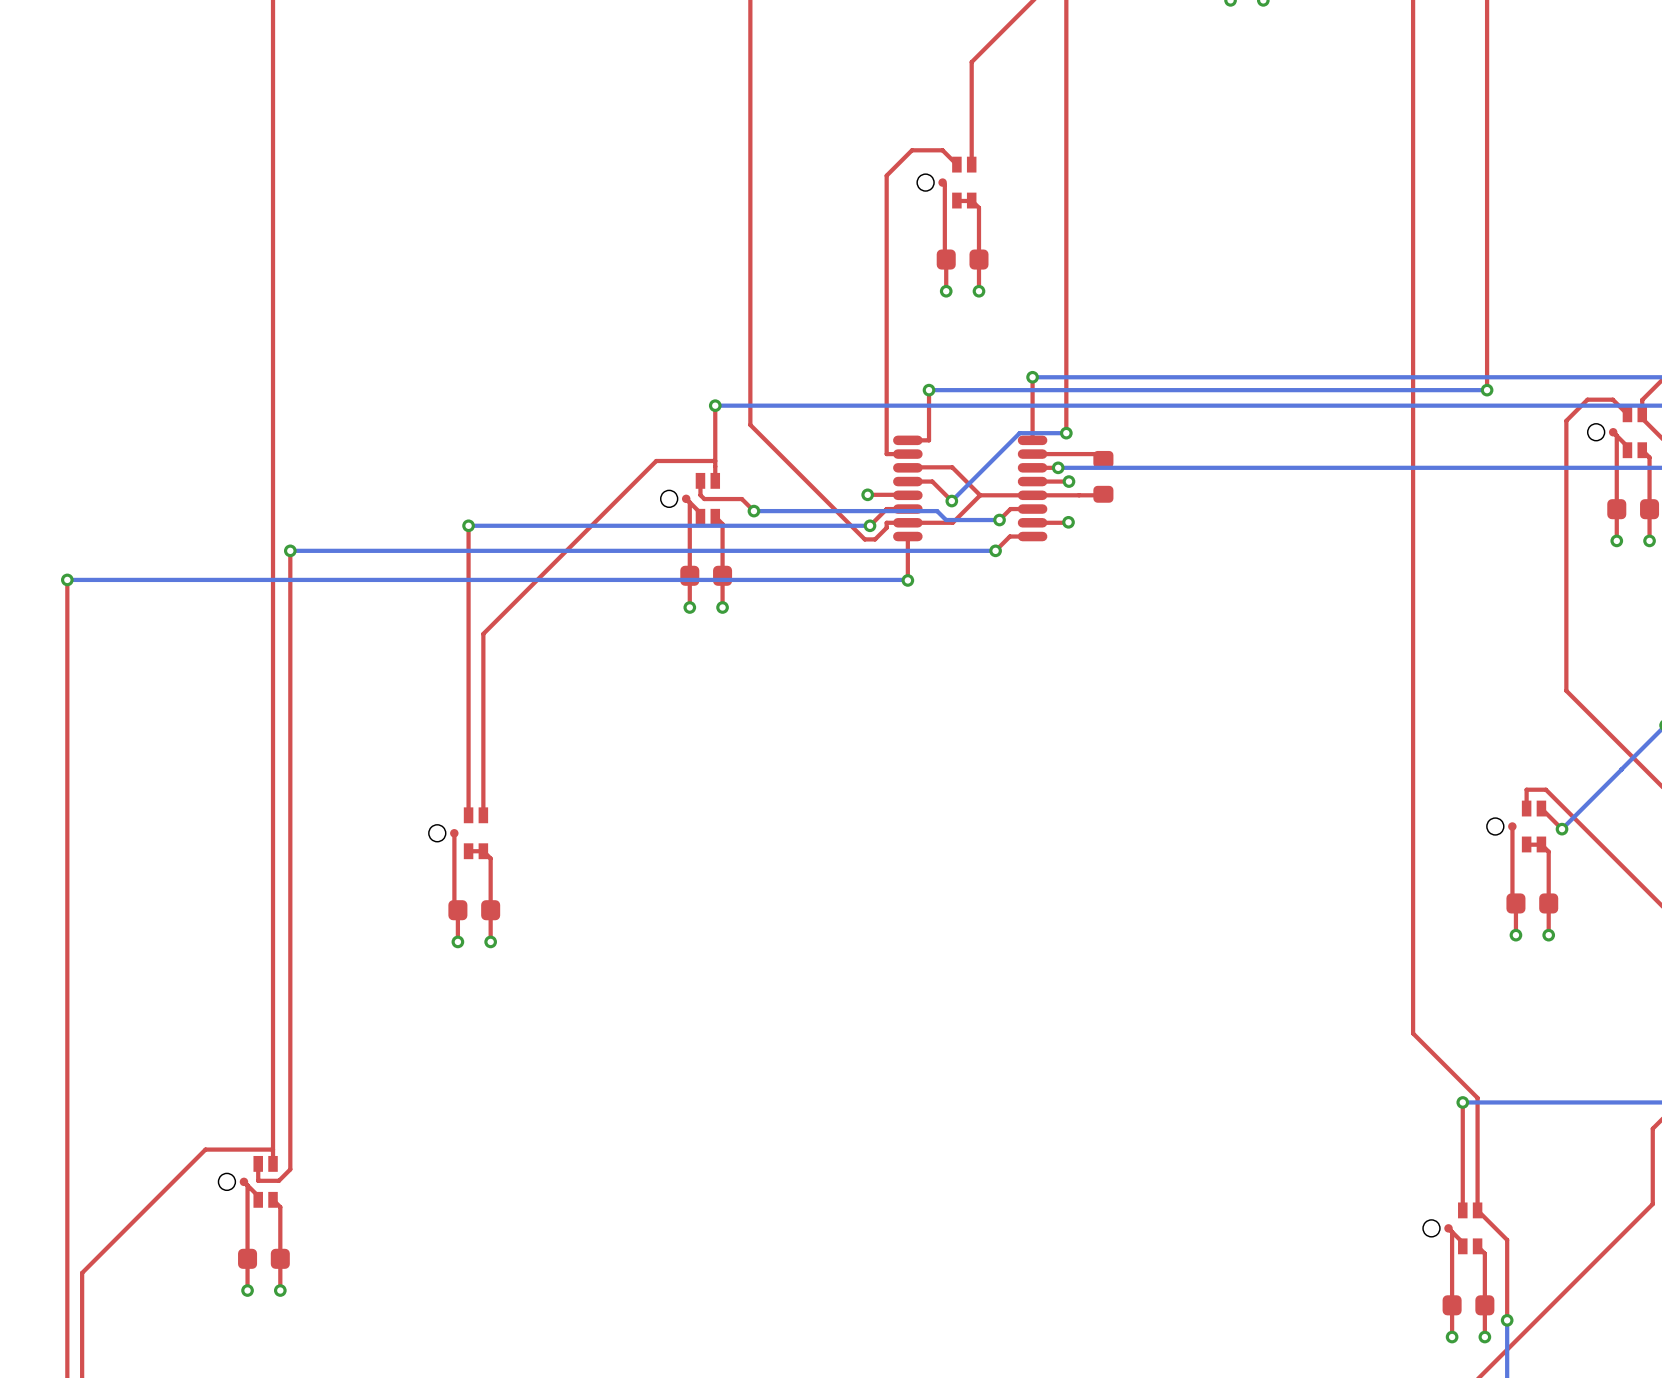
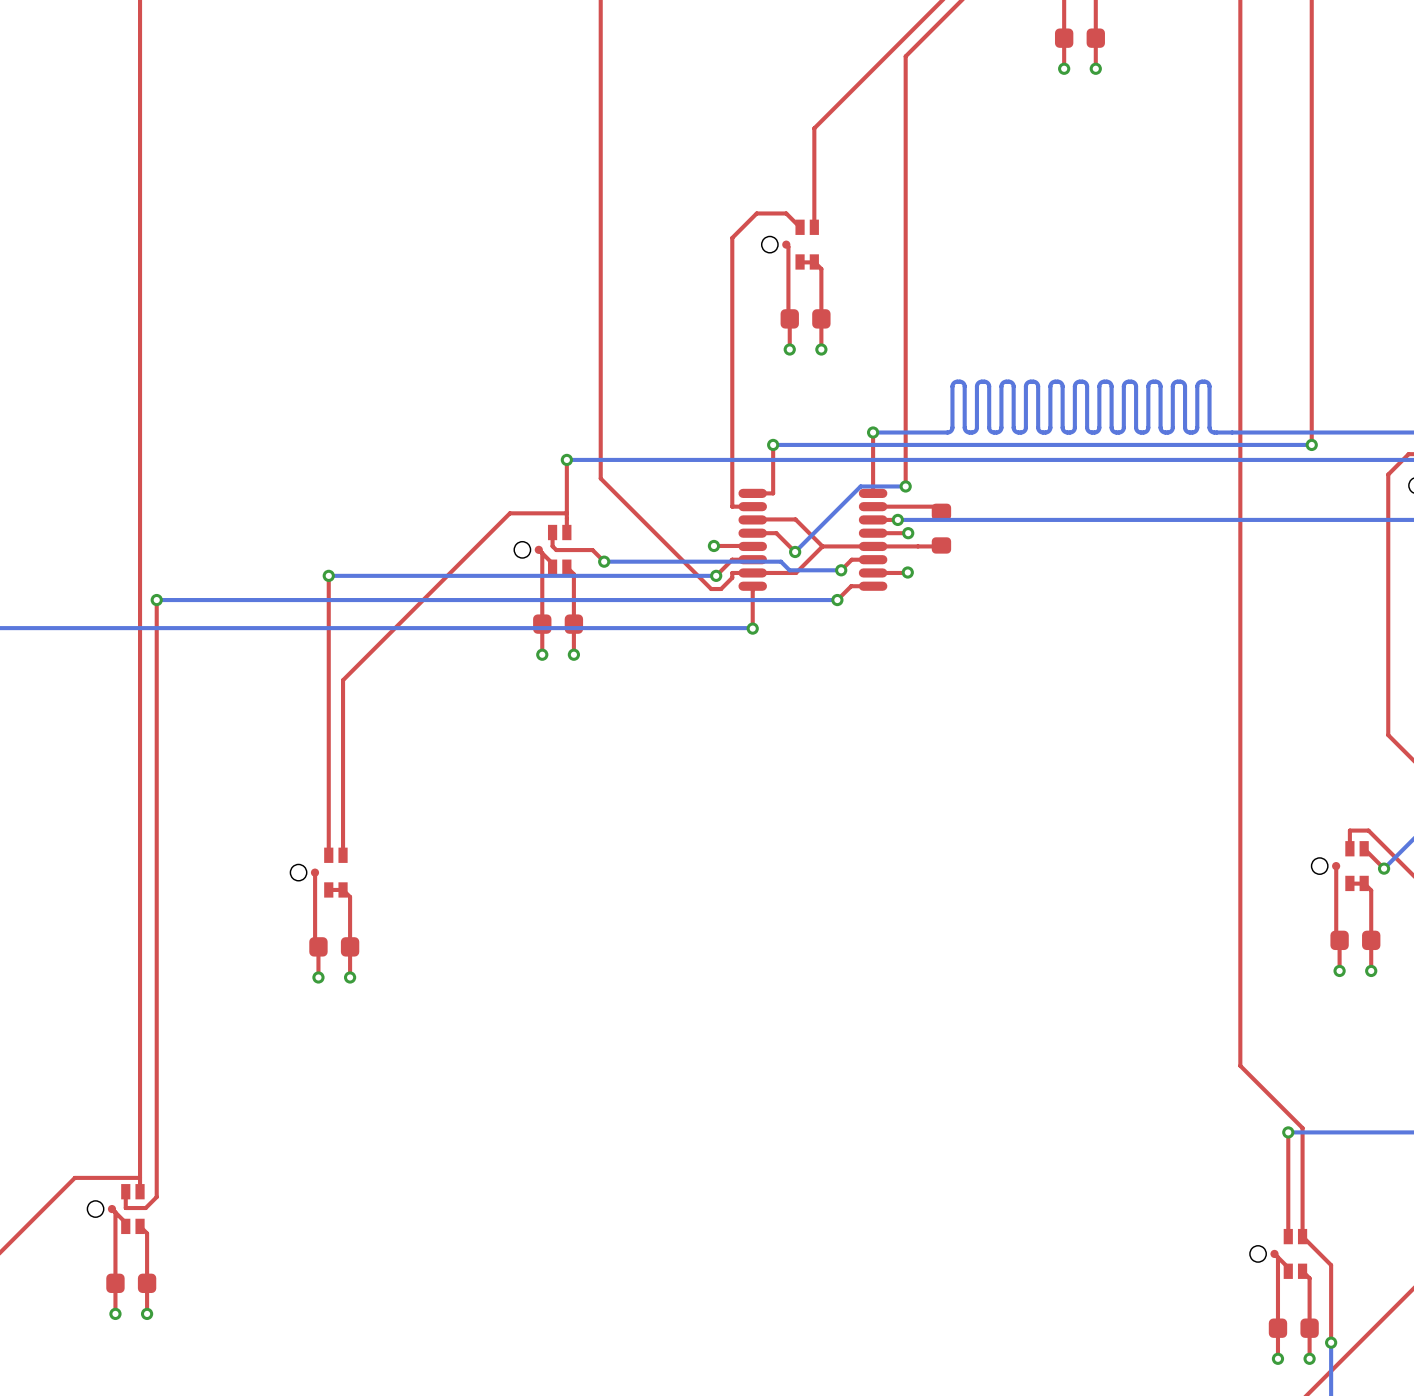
bottom track: (1132, 377) (1109, 377) -> (969, 432) (964, 428) (964, 385) (959, 381) (955, 382) (952, 385) (952, 428) (947, 432)
bottom track: (1157, 377) (1135, 377) -> (994, 432) (989, 428) (989, 385) (984, 381) (979, 382) (977, 385) (976, 428) (972, 432)
bottom track: (1183, 377) (1160, 377) -> (1018, 432) (1013, 428) (1013, 385) (1008, 381) (1004, 382) (1001, 385) (1001, 428) (996, 432)
bottom track: (1208, 377) (1185, 377) -> (1043, 432) (1038, 428) (1038, 385) (1033, 381) (1028, 382) (1026, 385) (1025, 428) (1021, 432)
bottom track: (1234, 377) (1211, 377) -> (1067, 432) (1062, 428) (1062, 385) (1057, 381) (1053, 382) (1050, 385) (1050, 428) (1045, 432)
bottom track: (1259, 377) (1236, 377) -> (1092, 432) (1087, 428) (1087, 385) (1082, 381) (1077, 382) (1074, 385) (1074, 428) (1069, 432)
bottom track: (1284, 377) (1261, 377) -> (1116, 432) (1111, 428) (1111, 385) (1106, 381) (1102, 382) (1099, 385) (1099, 428) (1094, 432)
bottom track: (1310, 377) (1287, 377) -> (1140, 432) (1136, 428) (1136, 385) (1131, 381) (1126, 382) (1123, 385) (1123, 428) (1118, 432)
bottom track: (1335, 377) (1312, 377) -> (1165, 432) (1160, 428) (1160, 385) (1155, 381) (1151, 382) (1148, 385) (1148, 428) (1143, 432)
bottom track: (1360, 377) (1338, 377) -> (1189, 432) (1185, 428) (1185, 385) (1180, 381) (1175, 382) (1172, 385) (1172, 428) (1167, 432)
bottom track: (1386, 377) (1363, 377) -> (1214, 432) (1209, 428) (1209, 385) (1204, 381) (1200, 382) (1197, 385) (1197, 428) (1192, 432)

